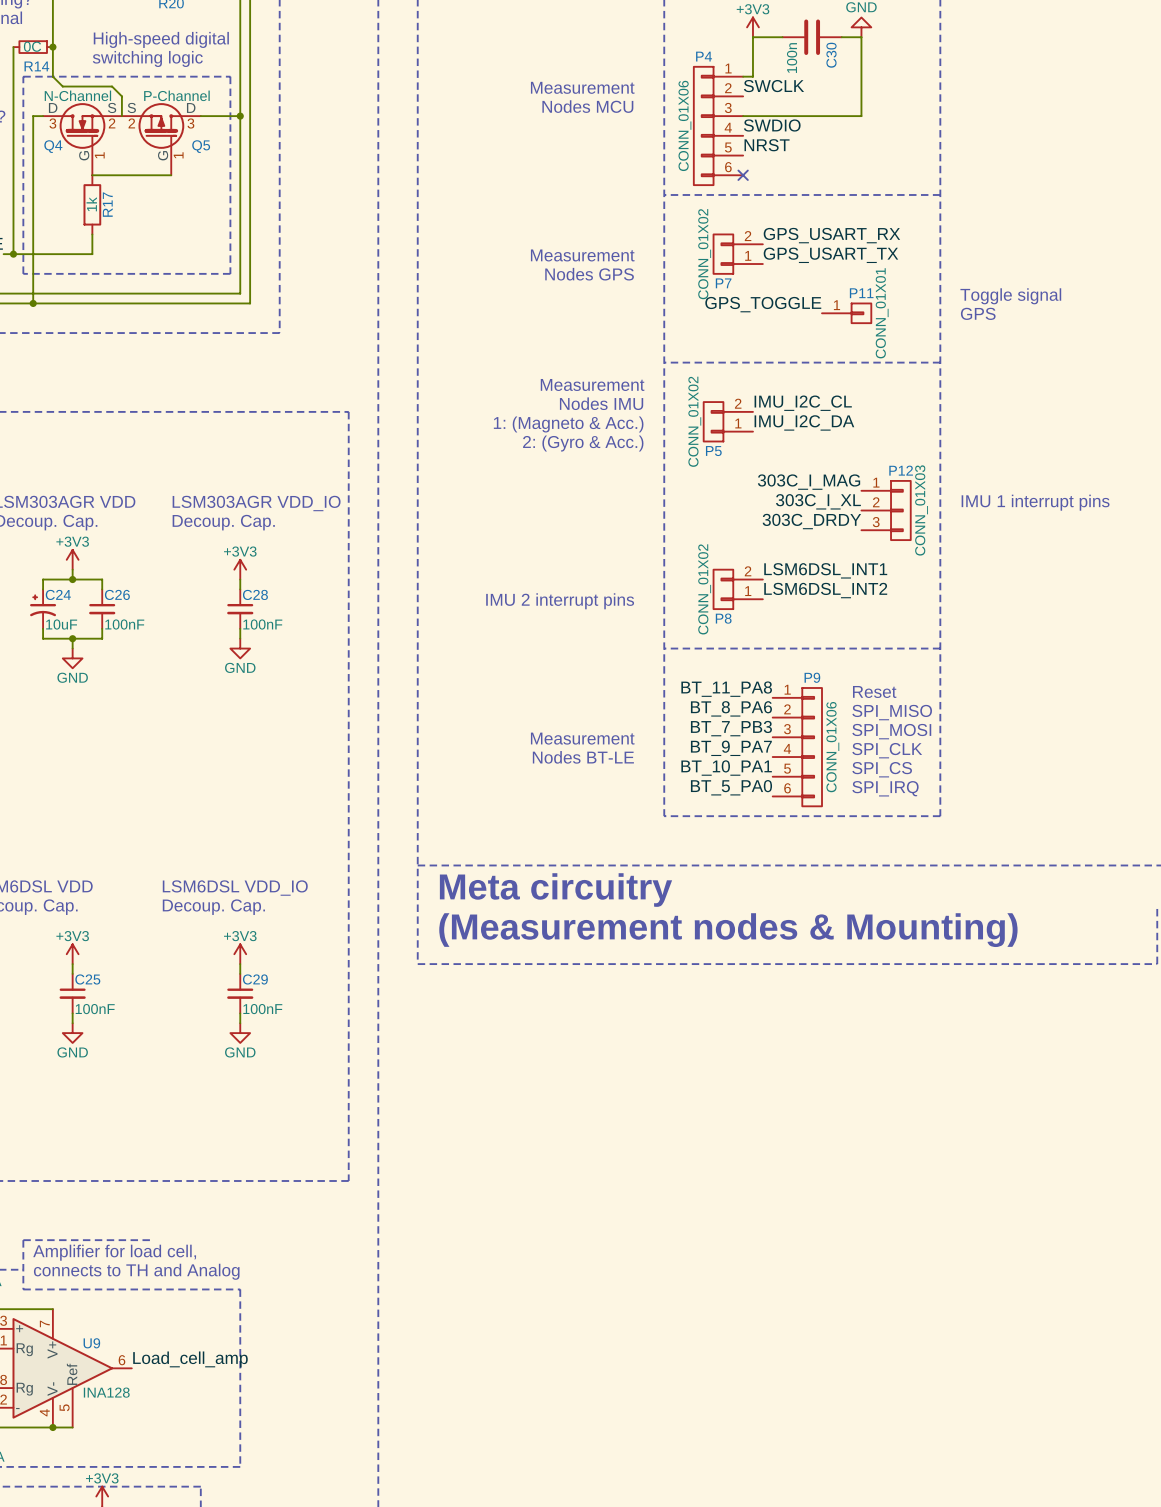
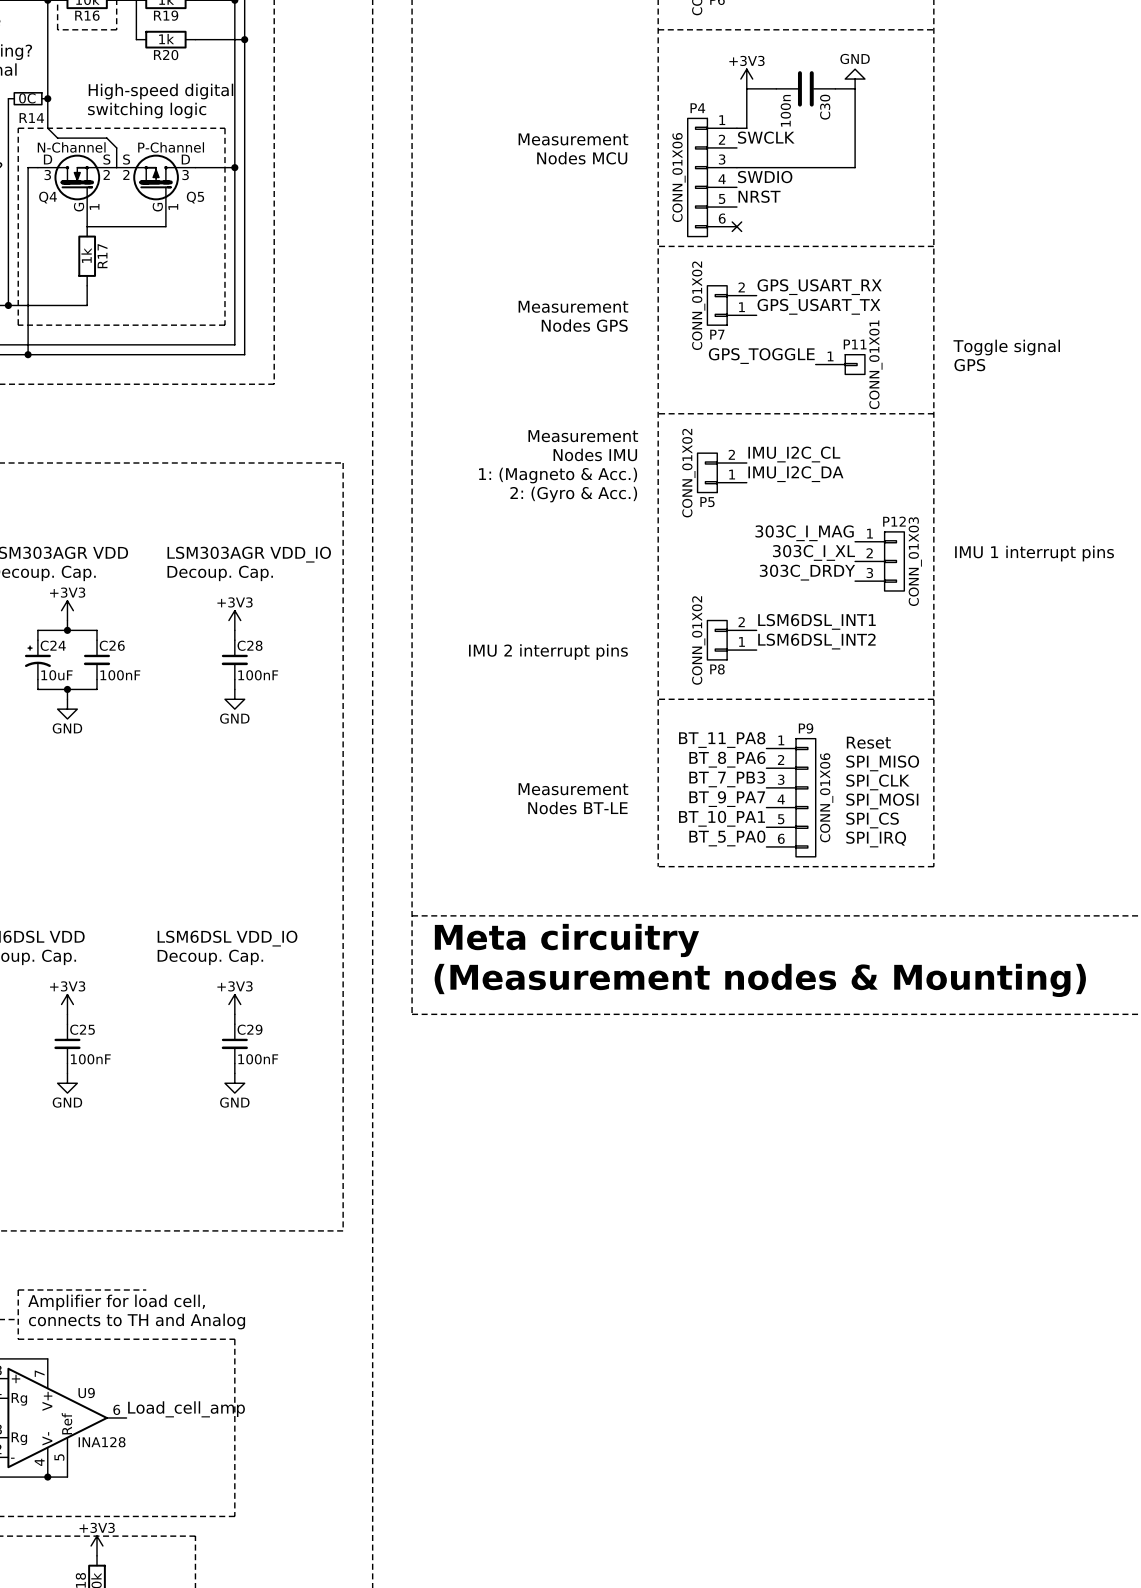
text: SPI_MOSI (891, 731) -> SPI_CLK (877, 782)
text: SPI_CLK (887, 750) -> SPI_MOSI (882, 801)

